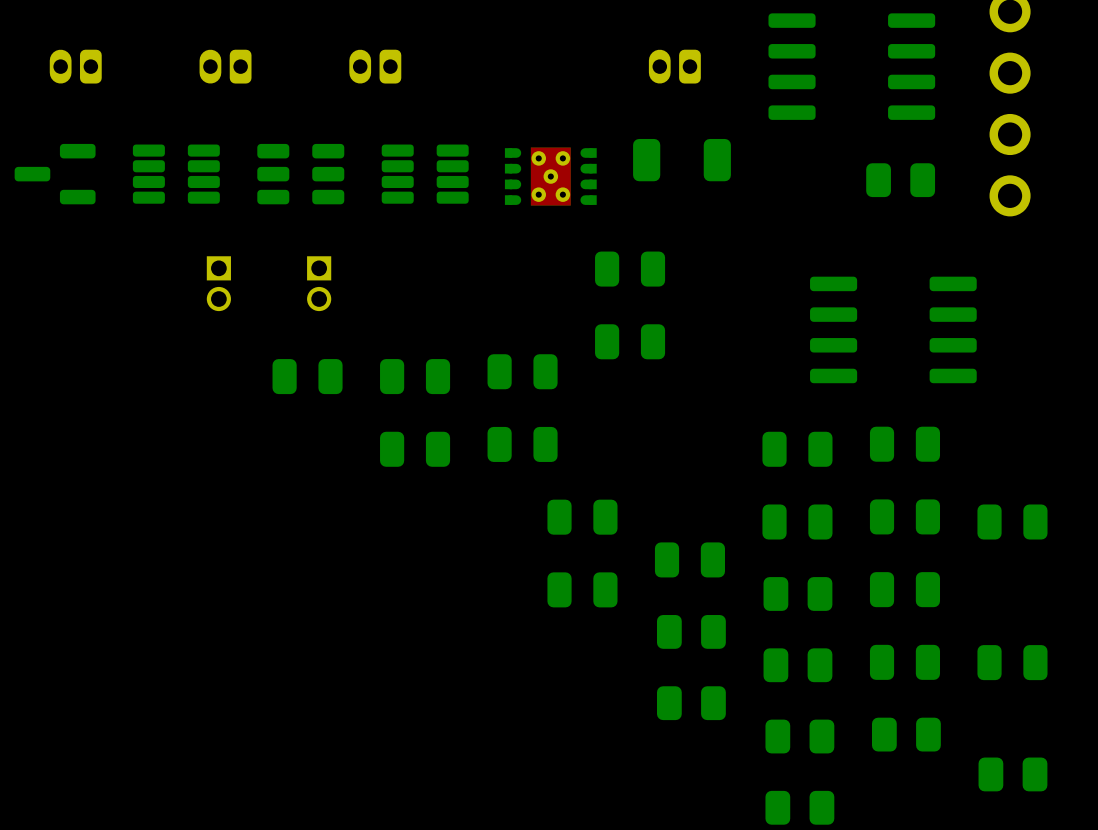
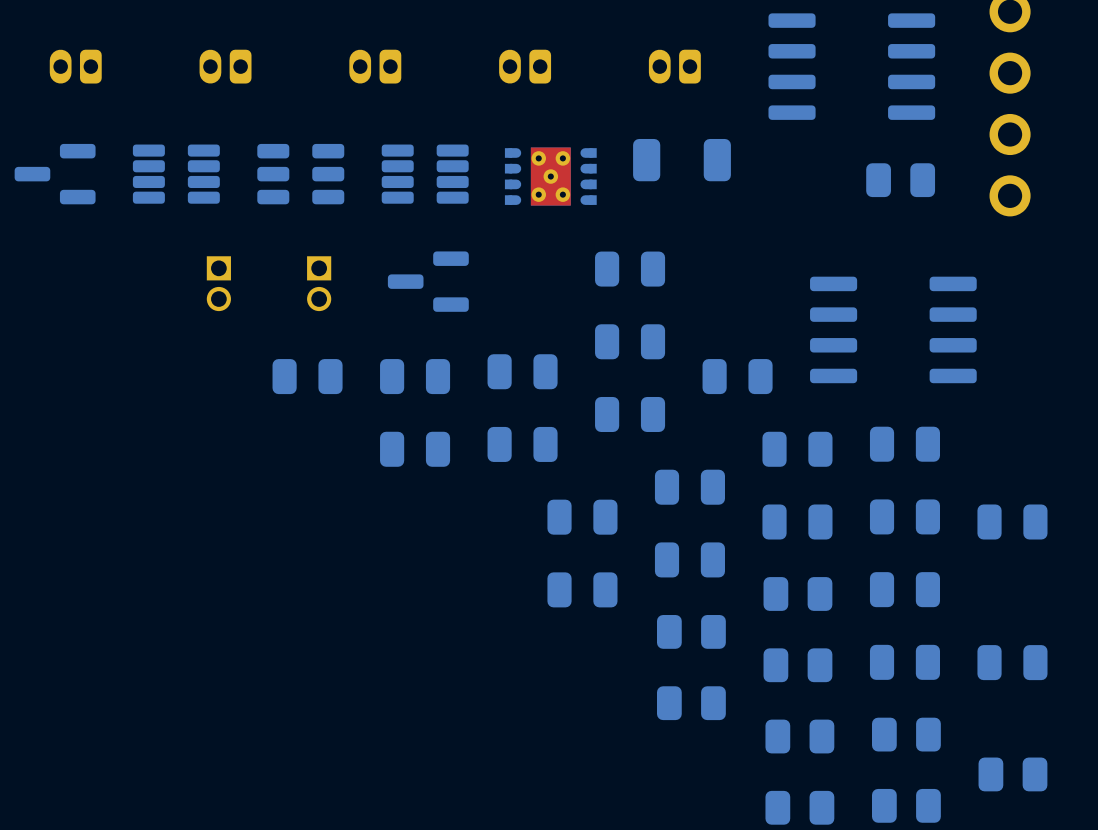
part: none -> (525, 66)
part: none -> (428, 281)
part: none -> (737, 376)
part: none -> (630, 414)
part: none -> (689, 487)
part: none -> (906, 805)

